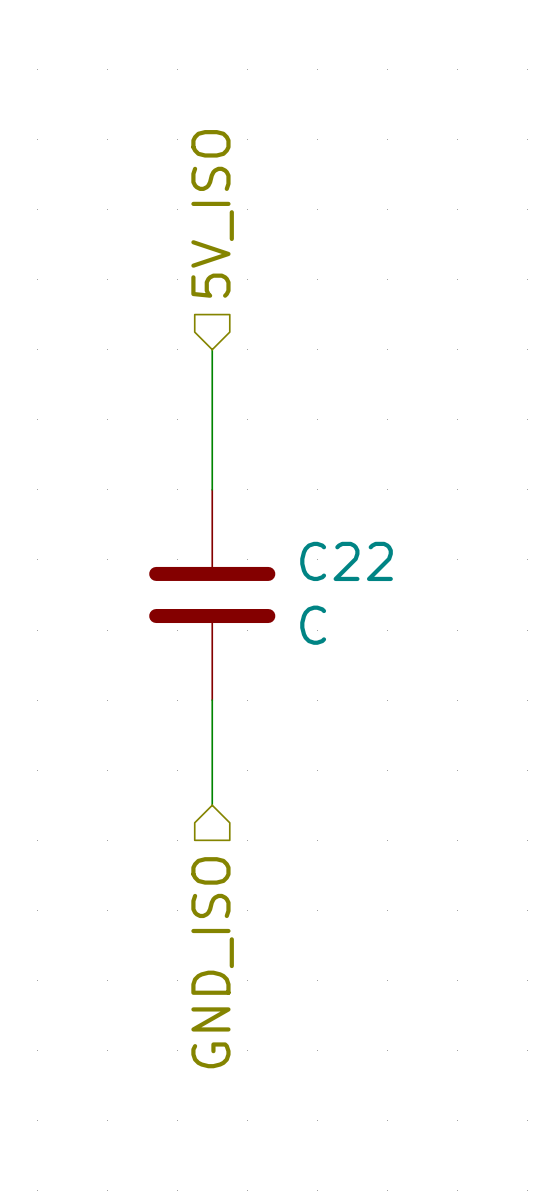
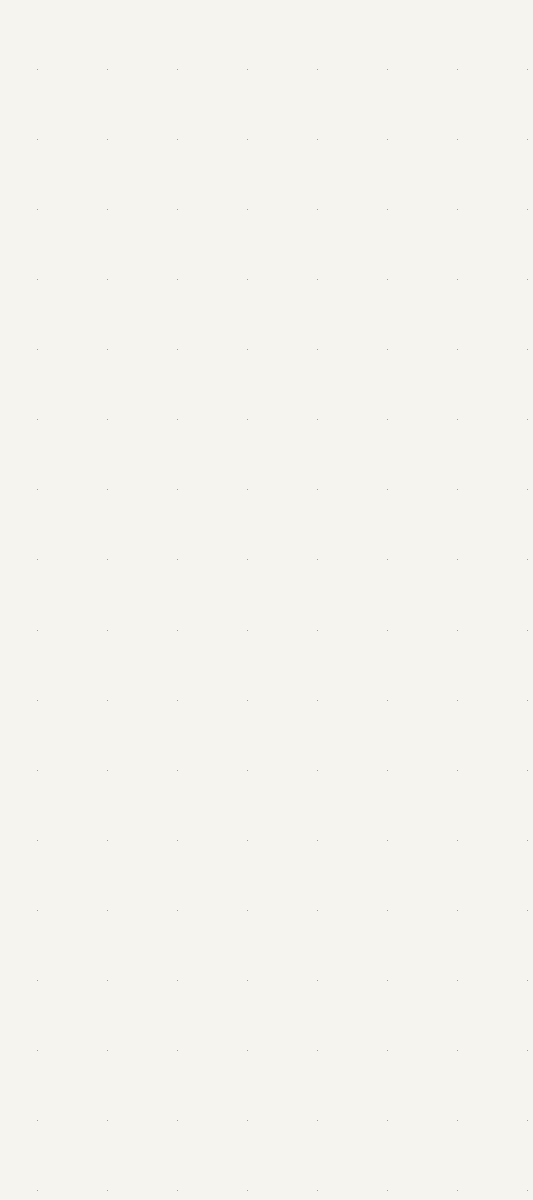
hierarchical label: 5V_ISO (212, 213) -> none
wire: (212, 349) (212, 489) -> none
C22: C (212, 594) -> none
wire: (212, 700) (212, 805) -> none
hierarchical label: GND_ISO (212, 962) -> none

